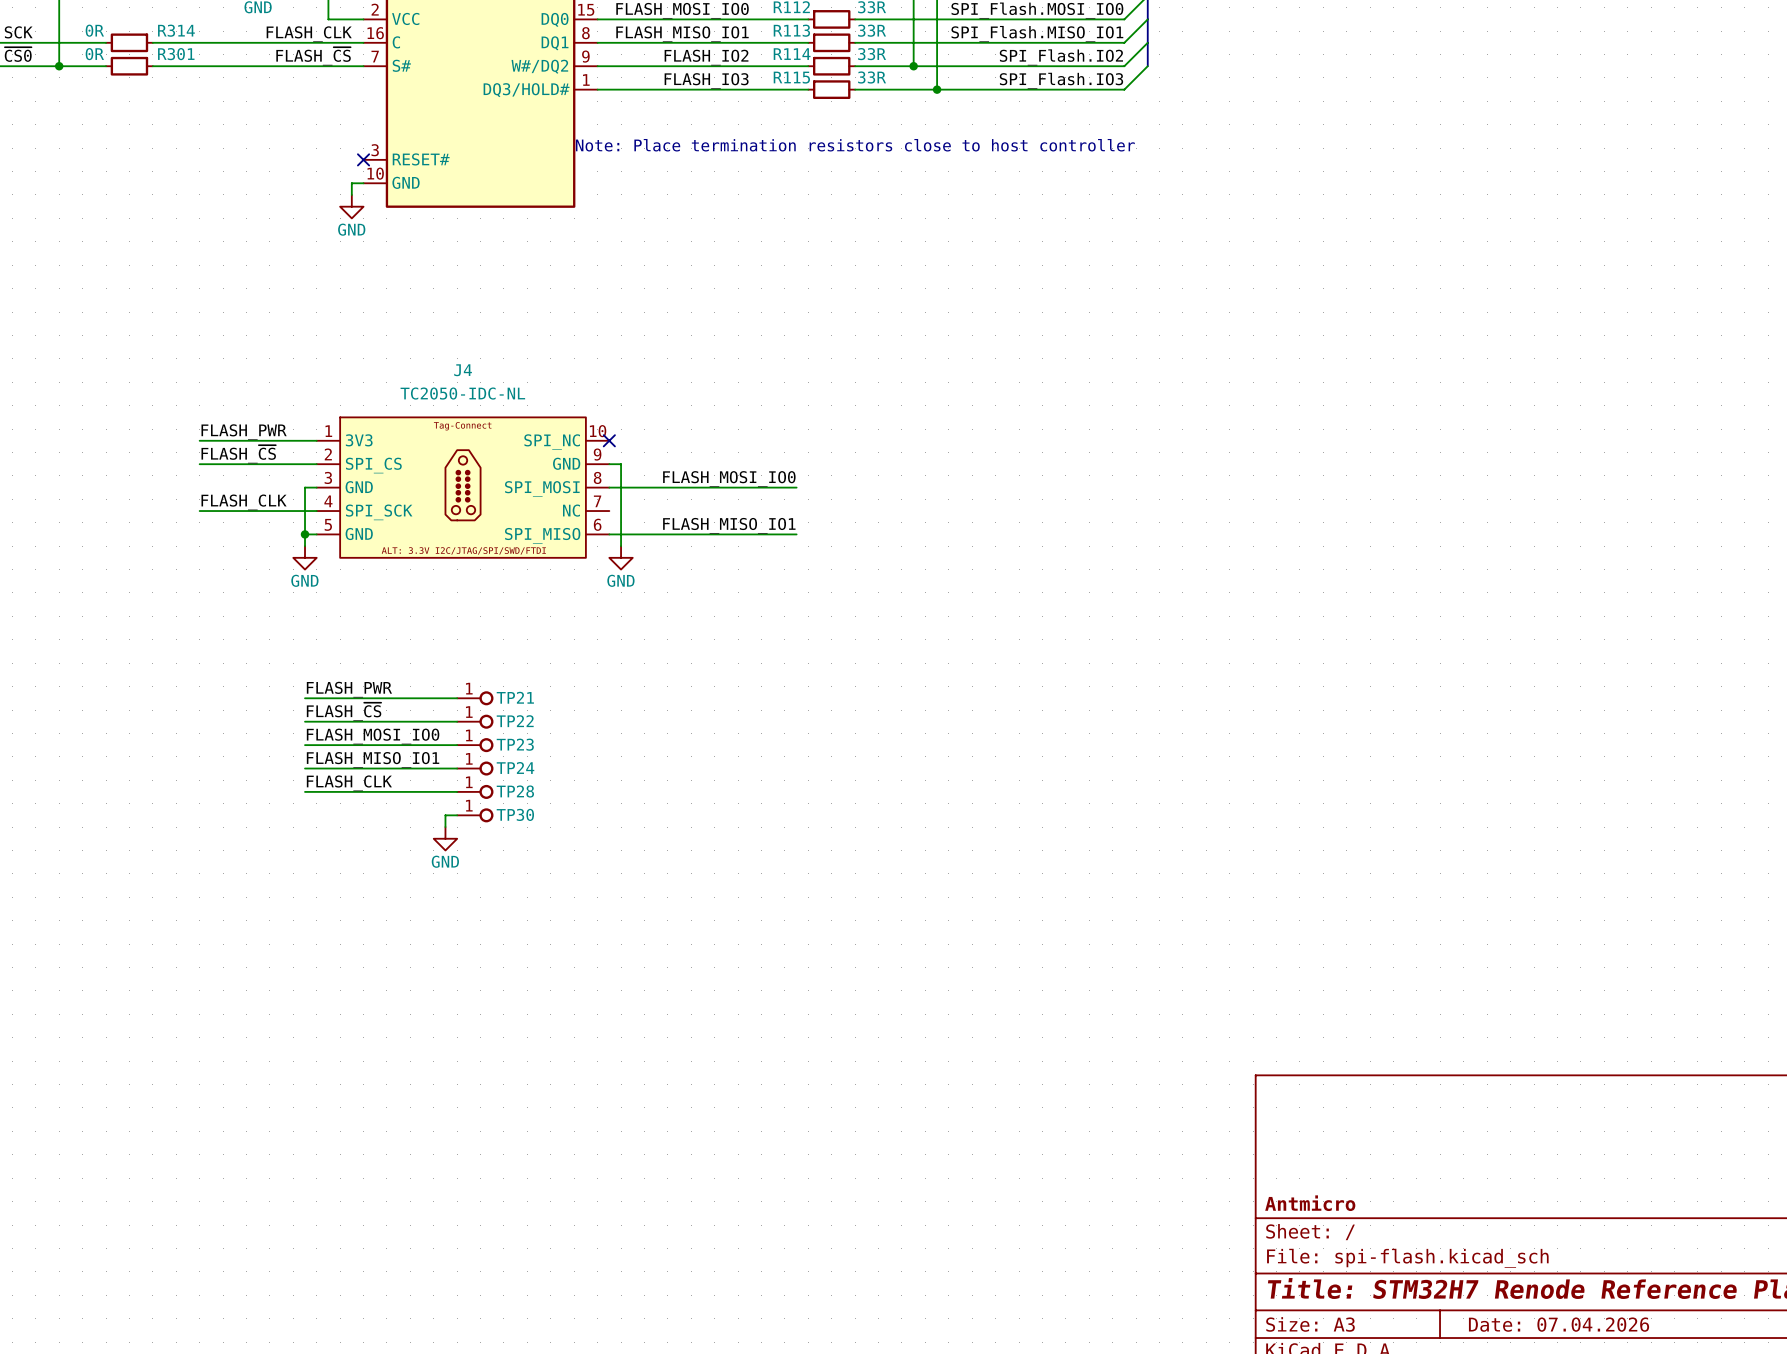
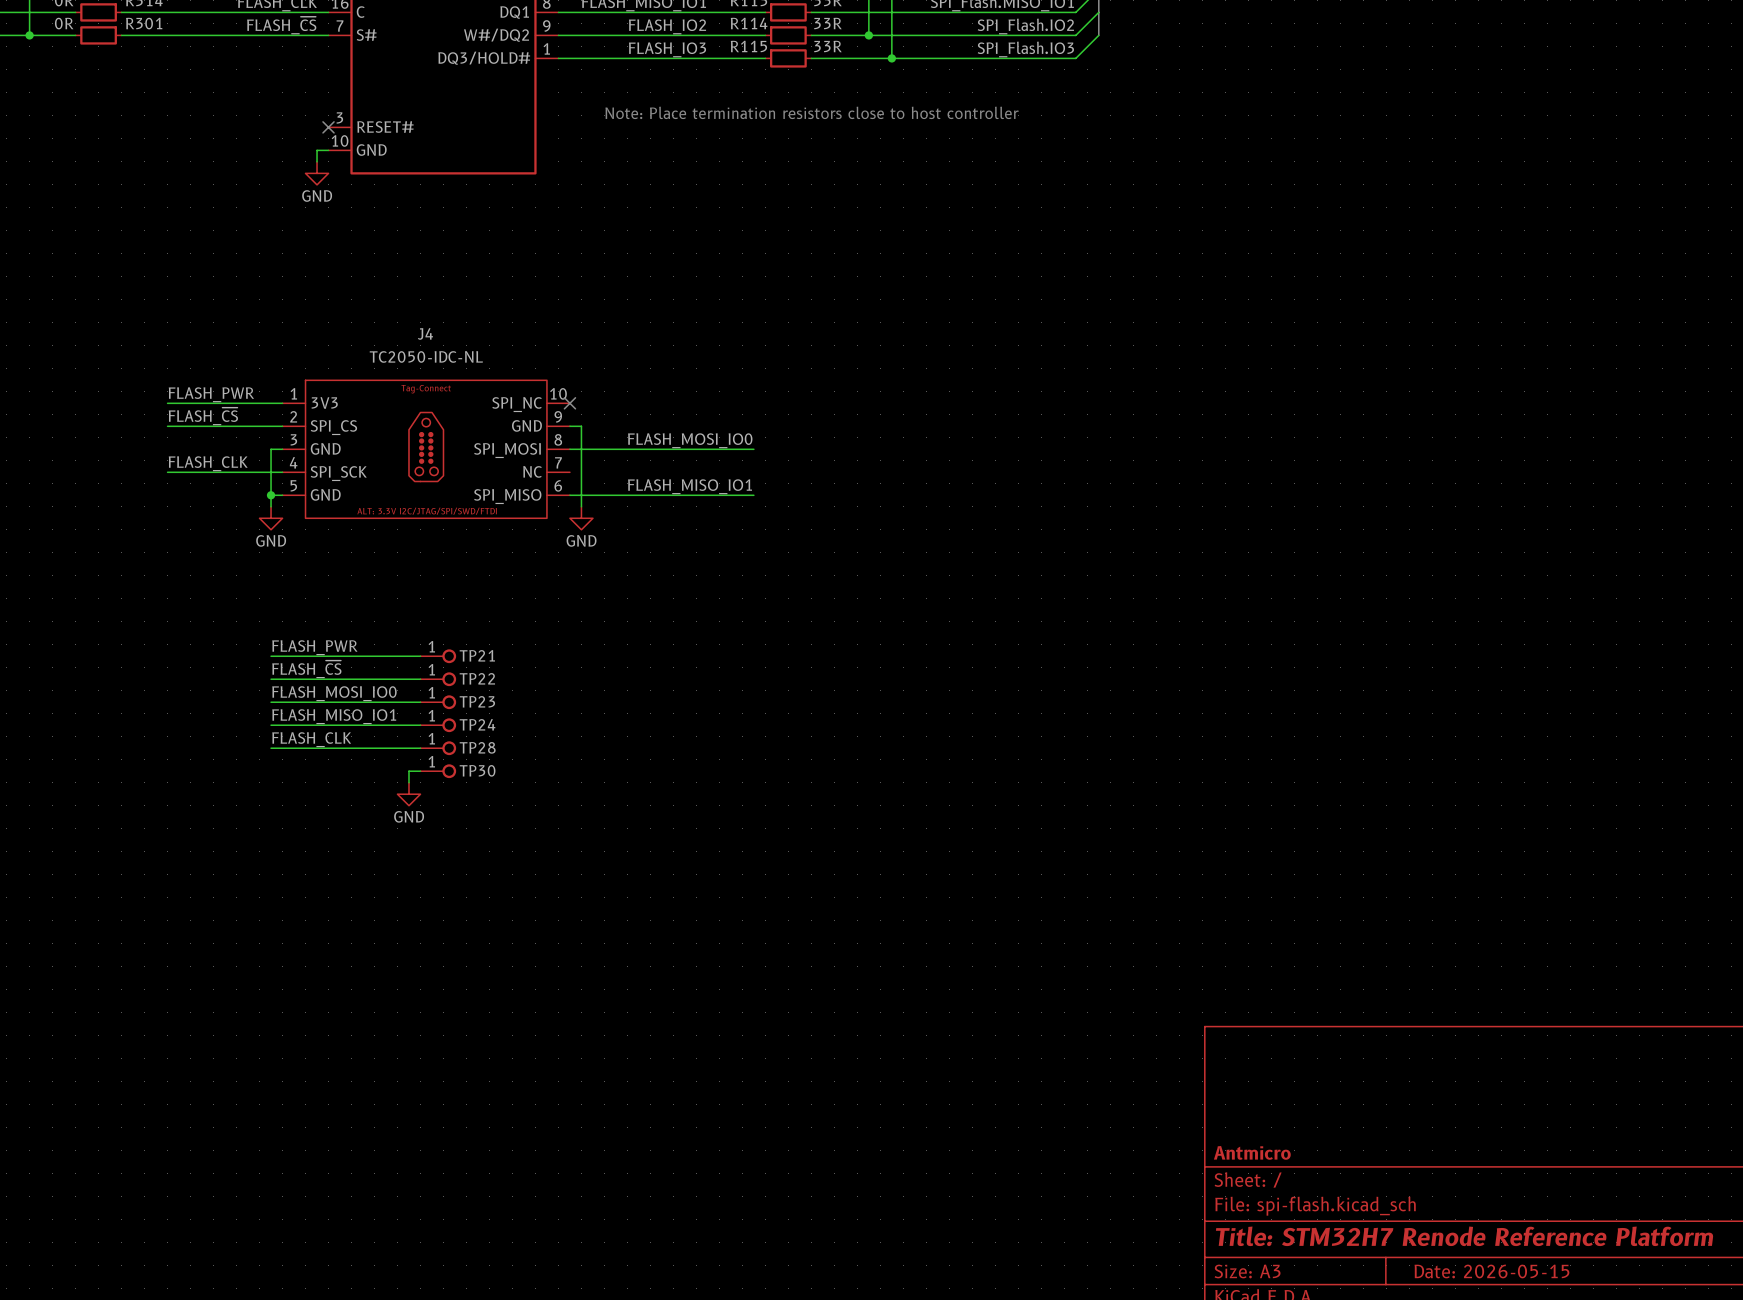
title block: Date: 07.04.2026 (1559, 1324) -> Date: 2026-05-15 (1491, 1271)

